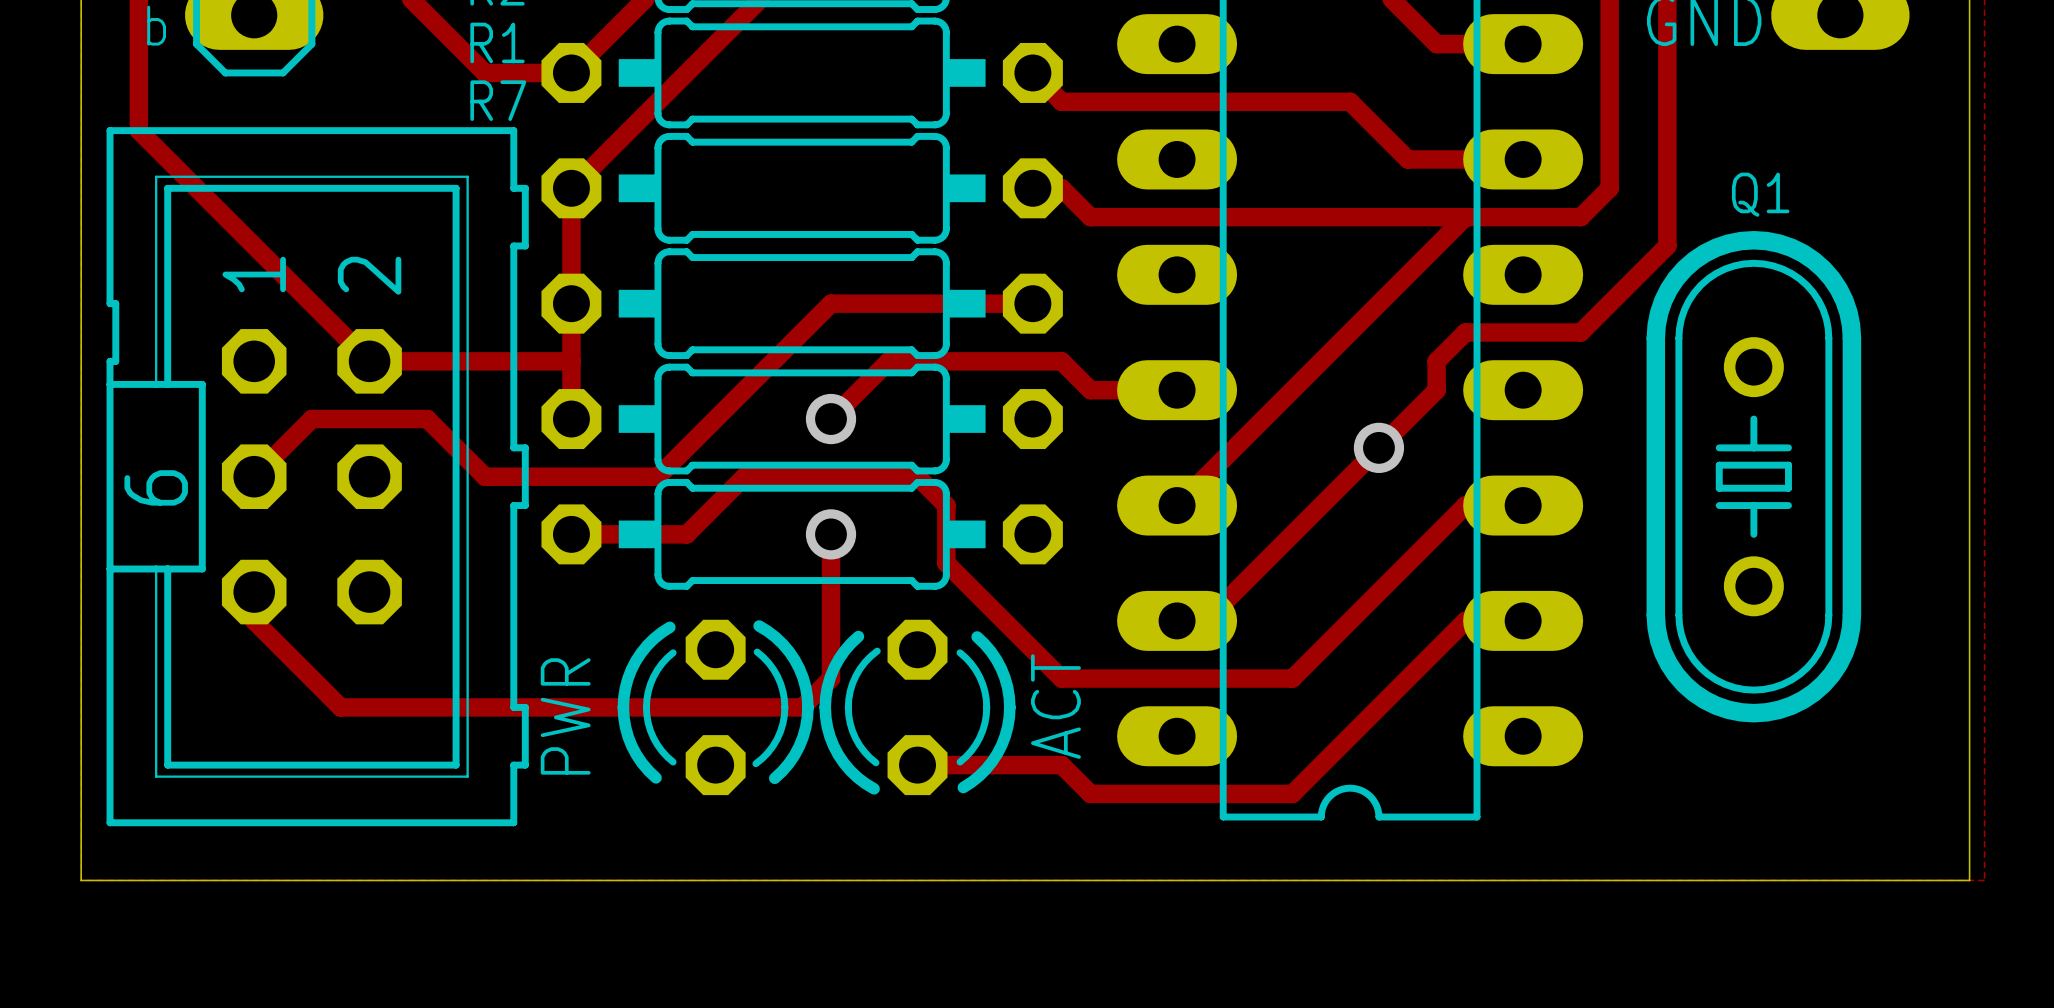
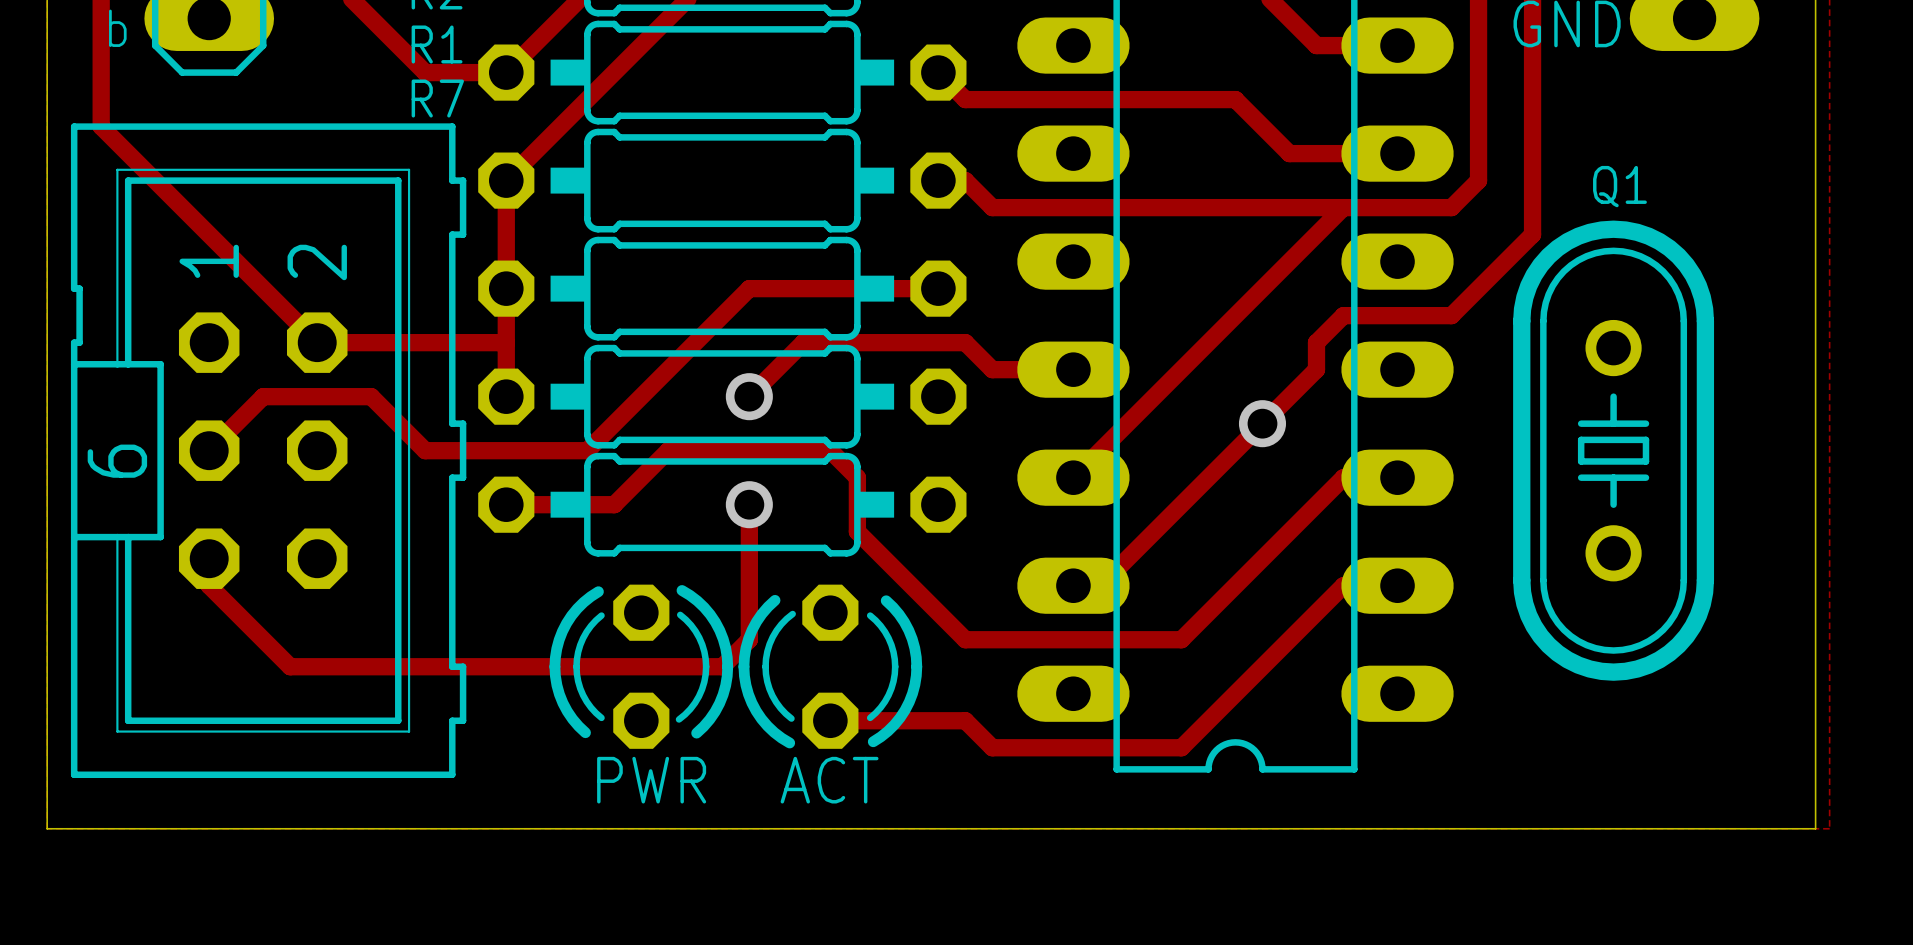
text rotation: 0° (1055, 706) -> 90° clockwise (829, 780)
text position: ACT (1055, 706) -> ACT (829, 780)
text rotation: 0° (565, 716) -> 90° clockwise (651, 780)
text position: PWR (565, 716) -> PWR (651, 780)

